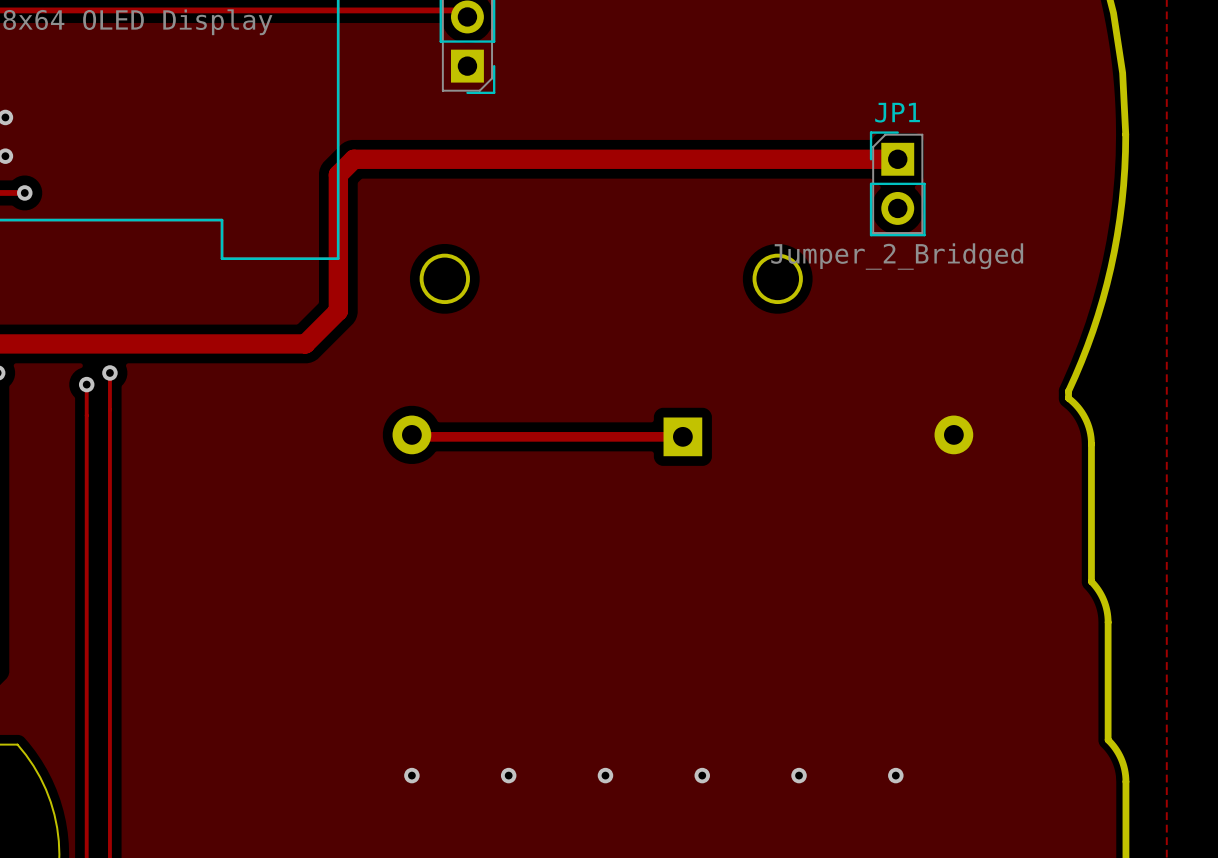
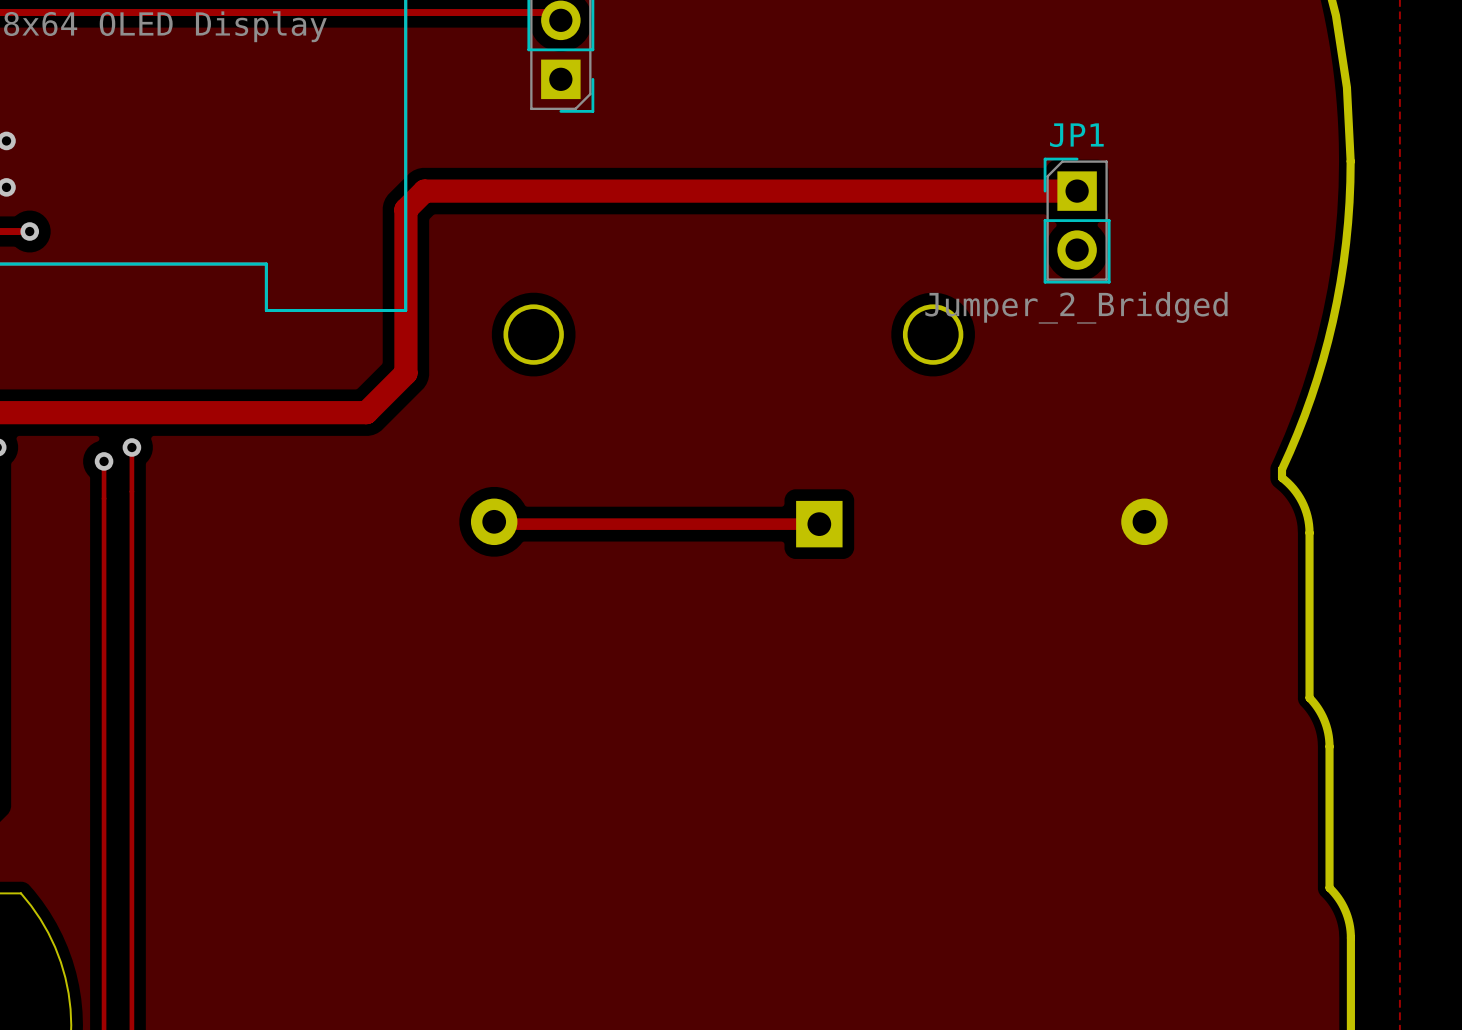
via: (411, 775) -> none
via: (508, 775) -> none
via: (605, 775) -> none
via: (702, 775) -> none
via: (799, 775) -> none
via: (895, 775) -> none

